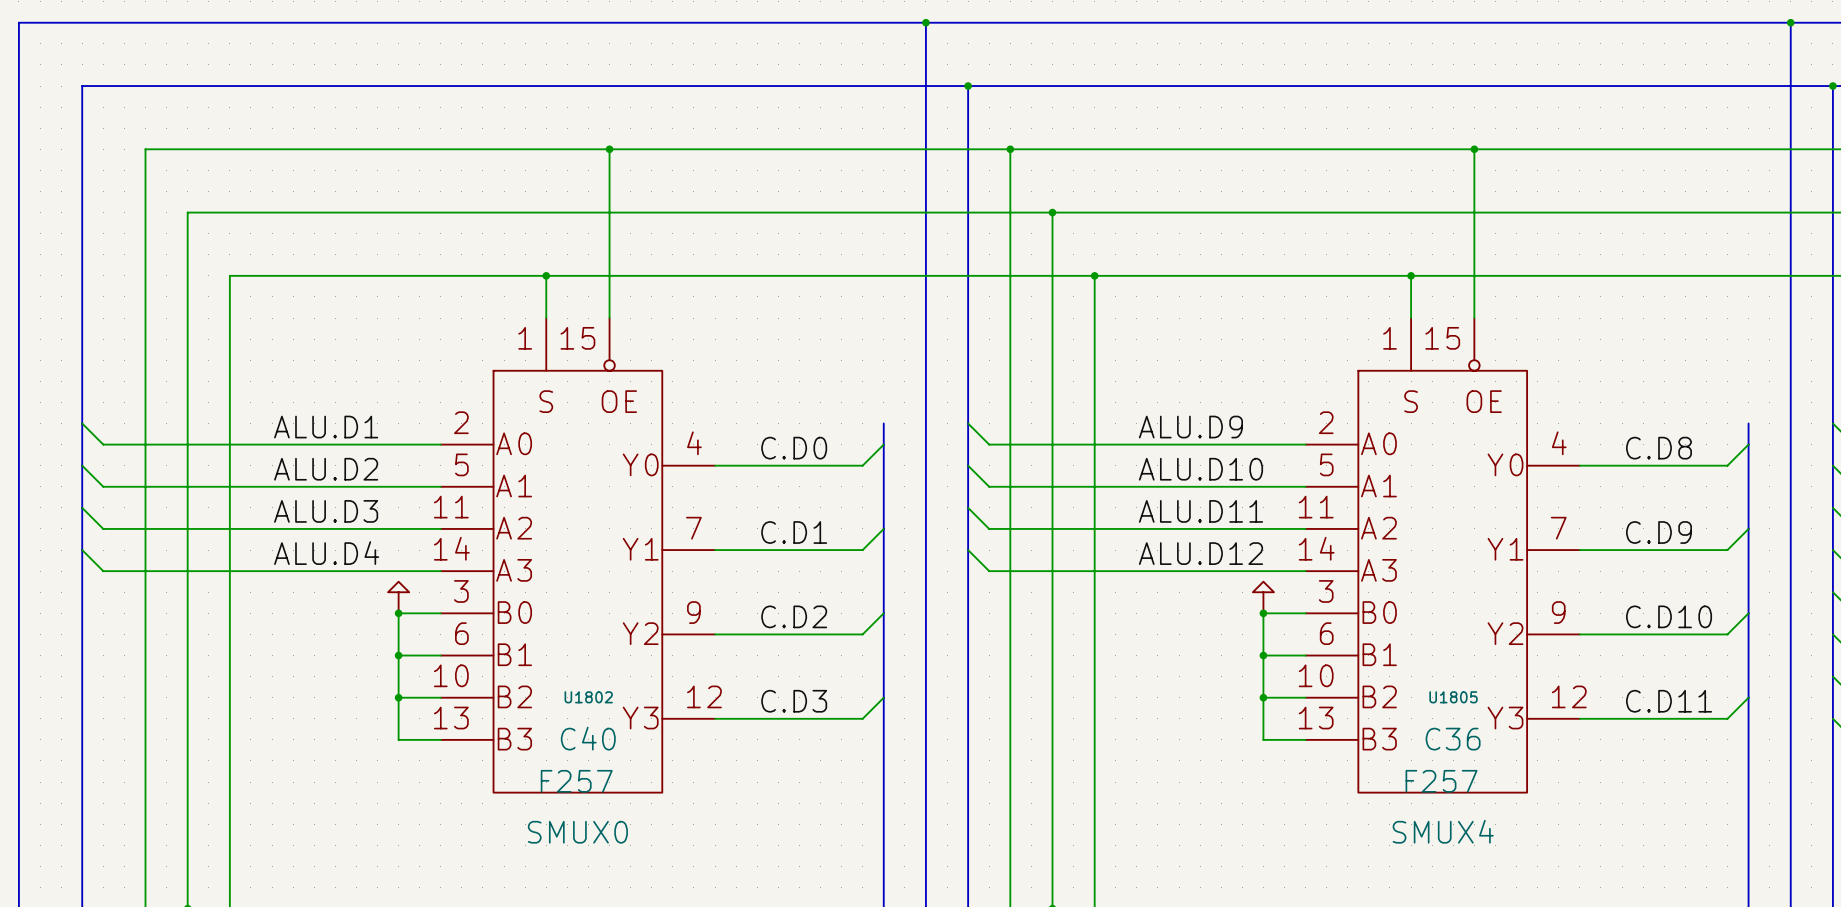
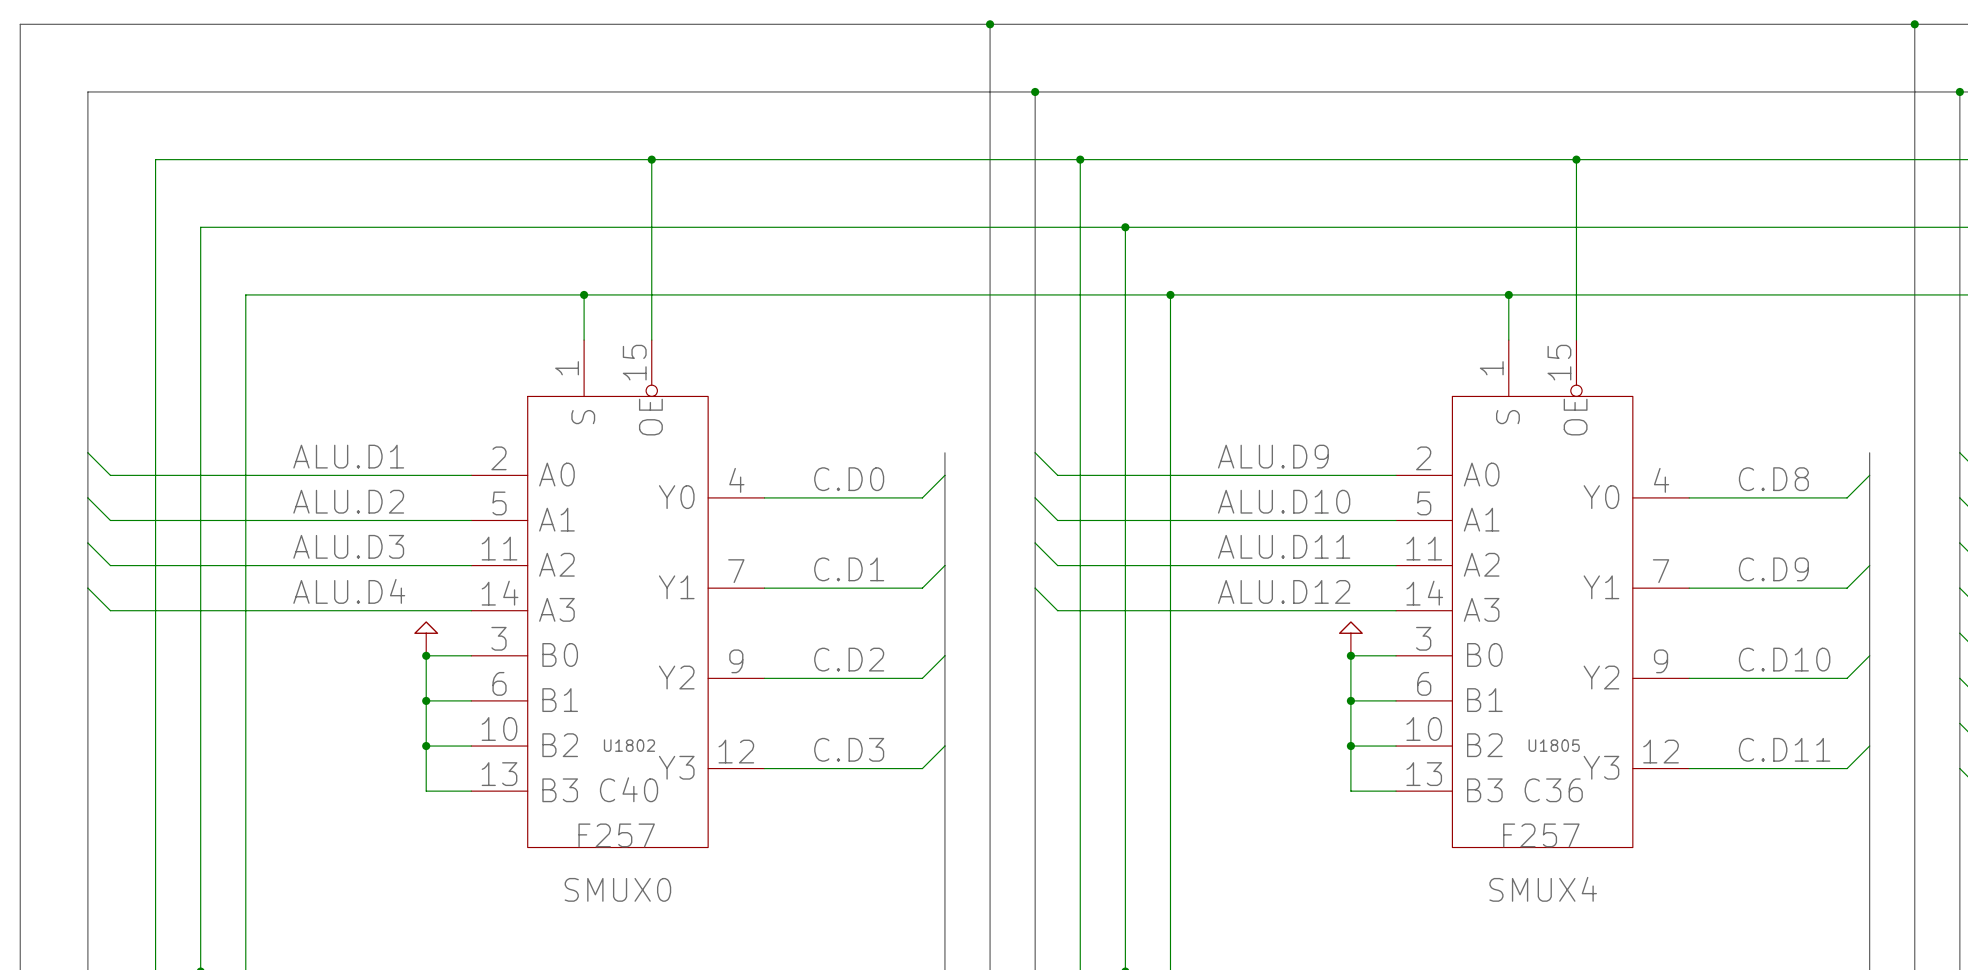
U1802 symbol: [440, 318, 716, 793] -> [471, 340, 765, 848]
U1805 symbol: [1305, 318, 1580, 793] -> [1396, 340, 1690, 848]

